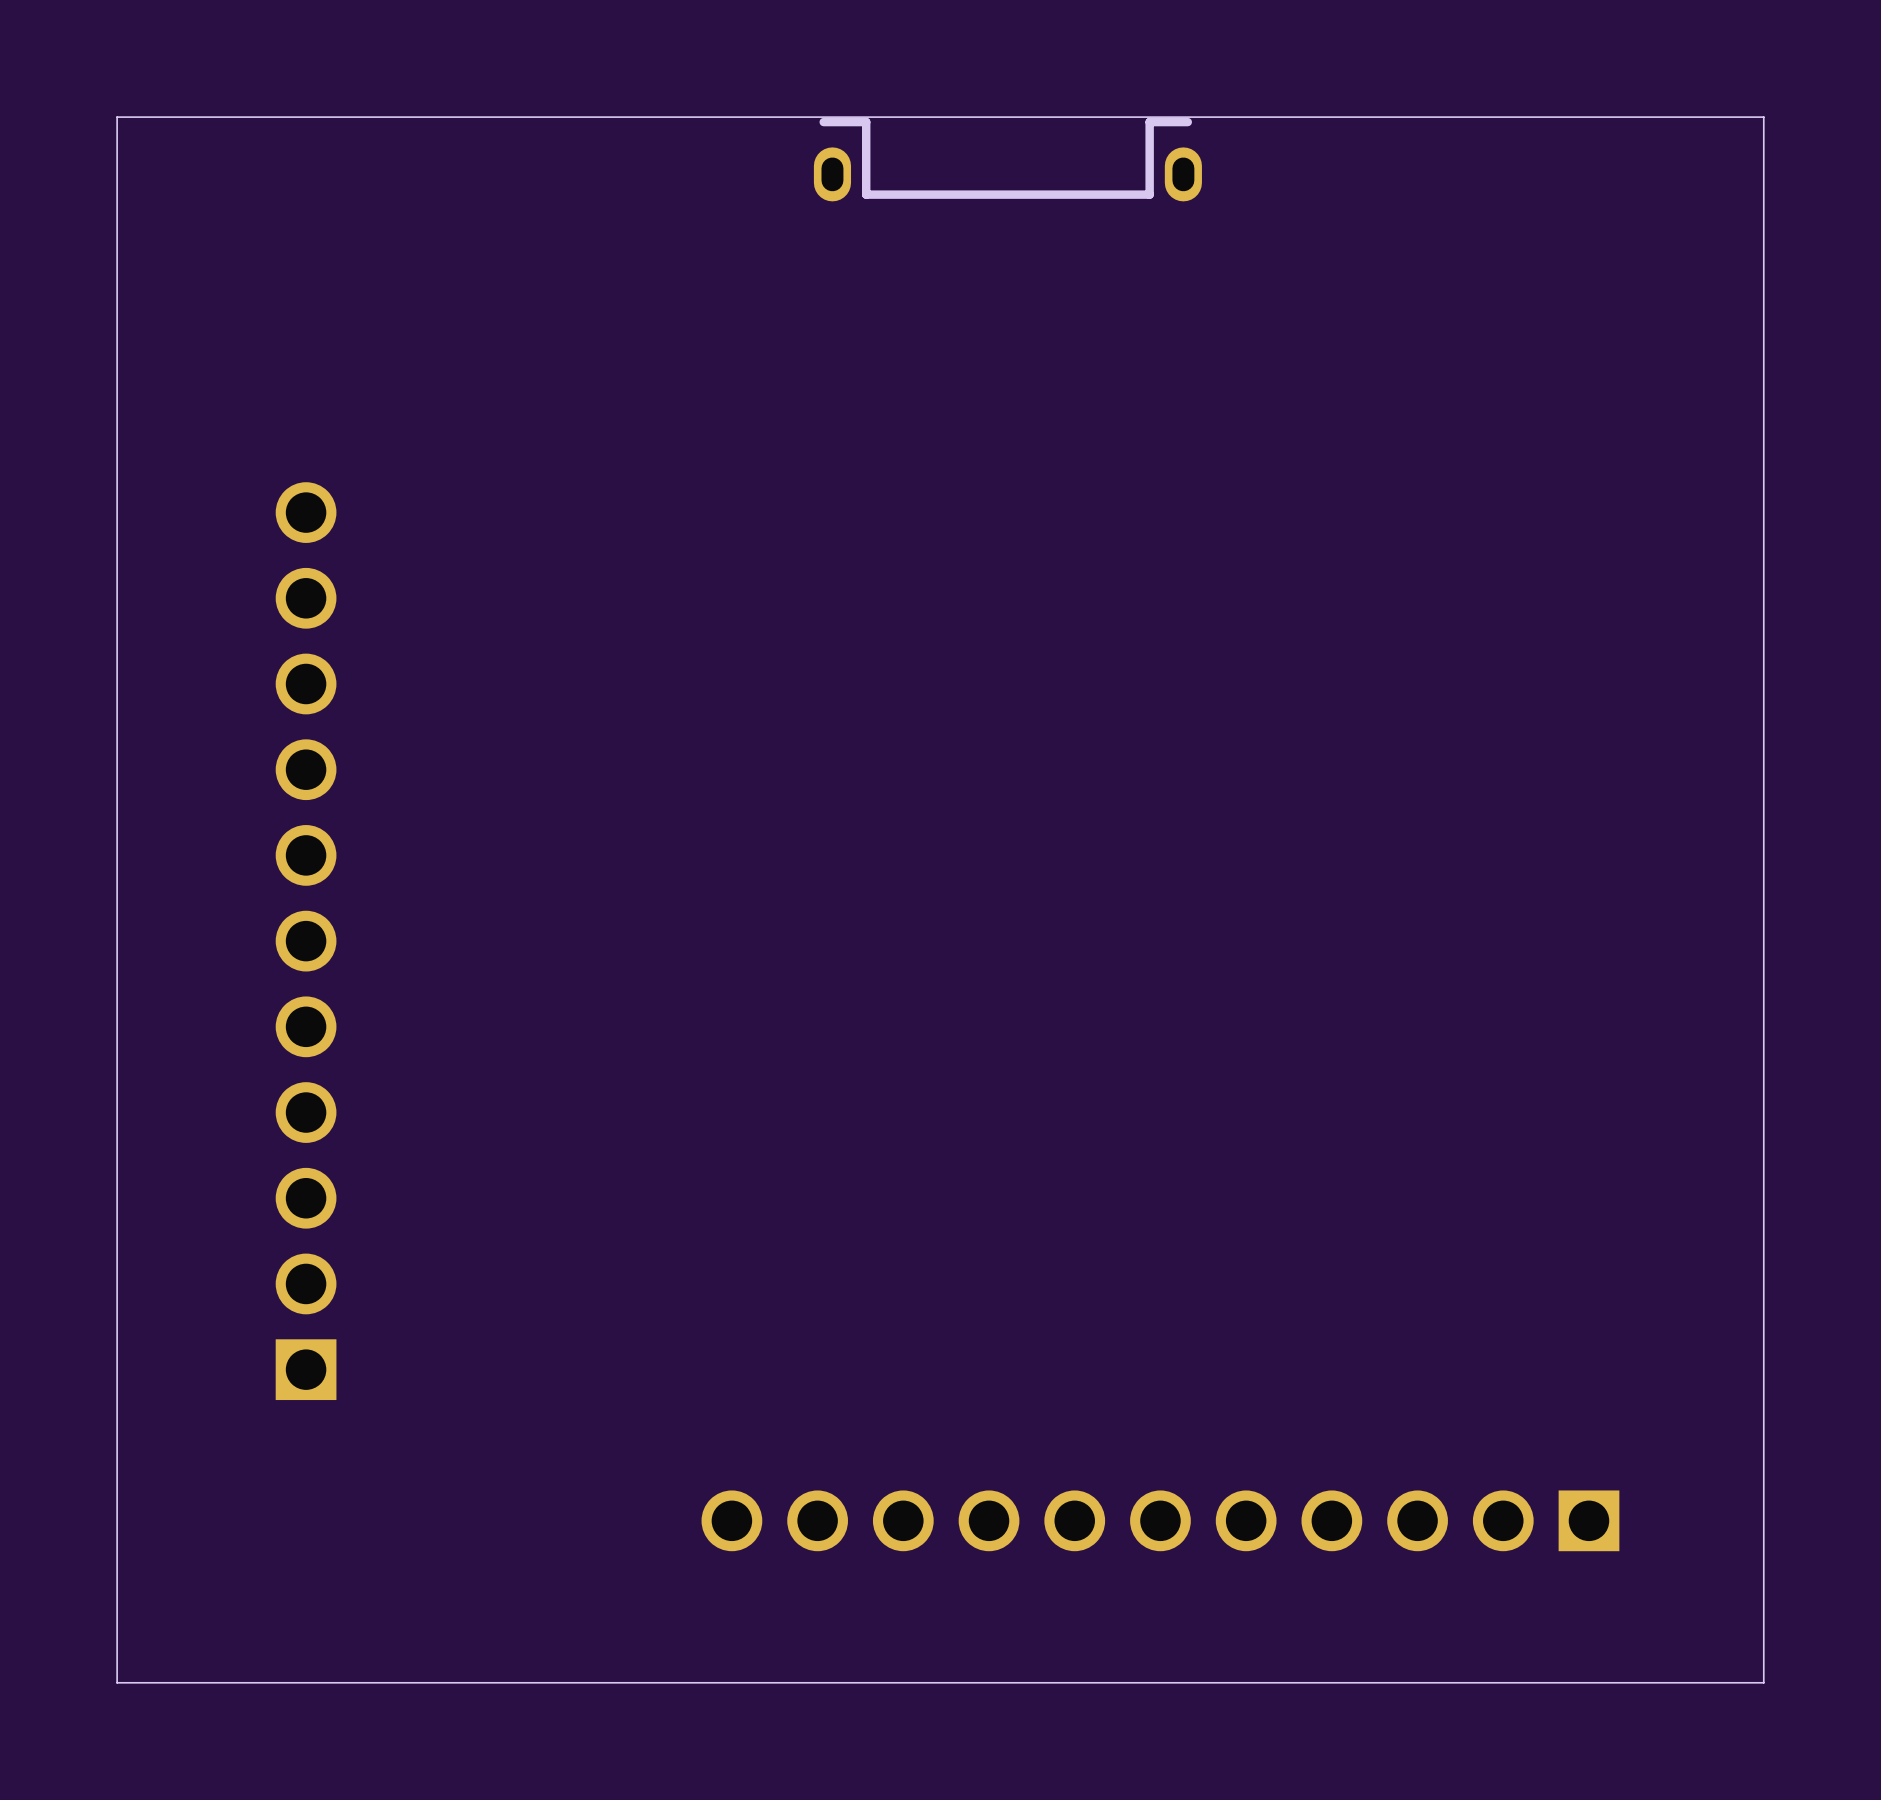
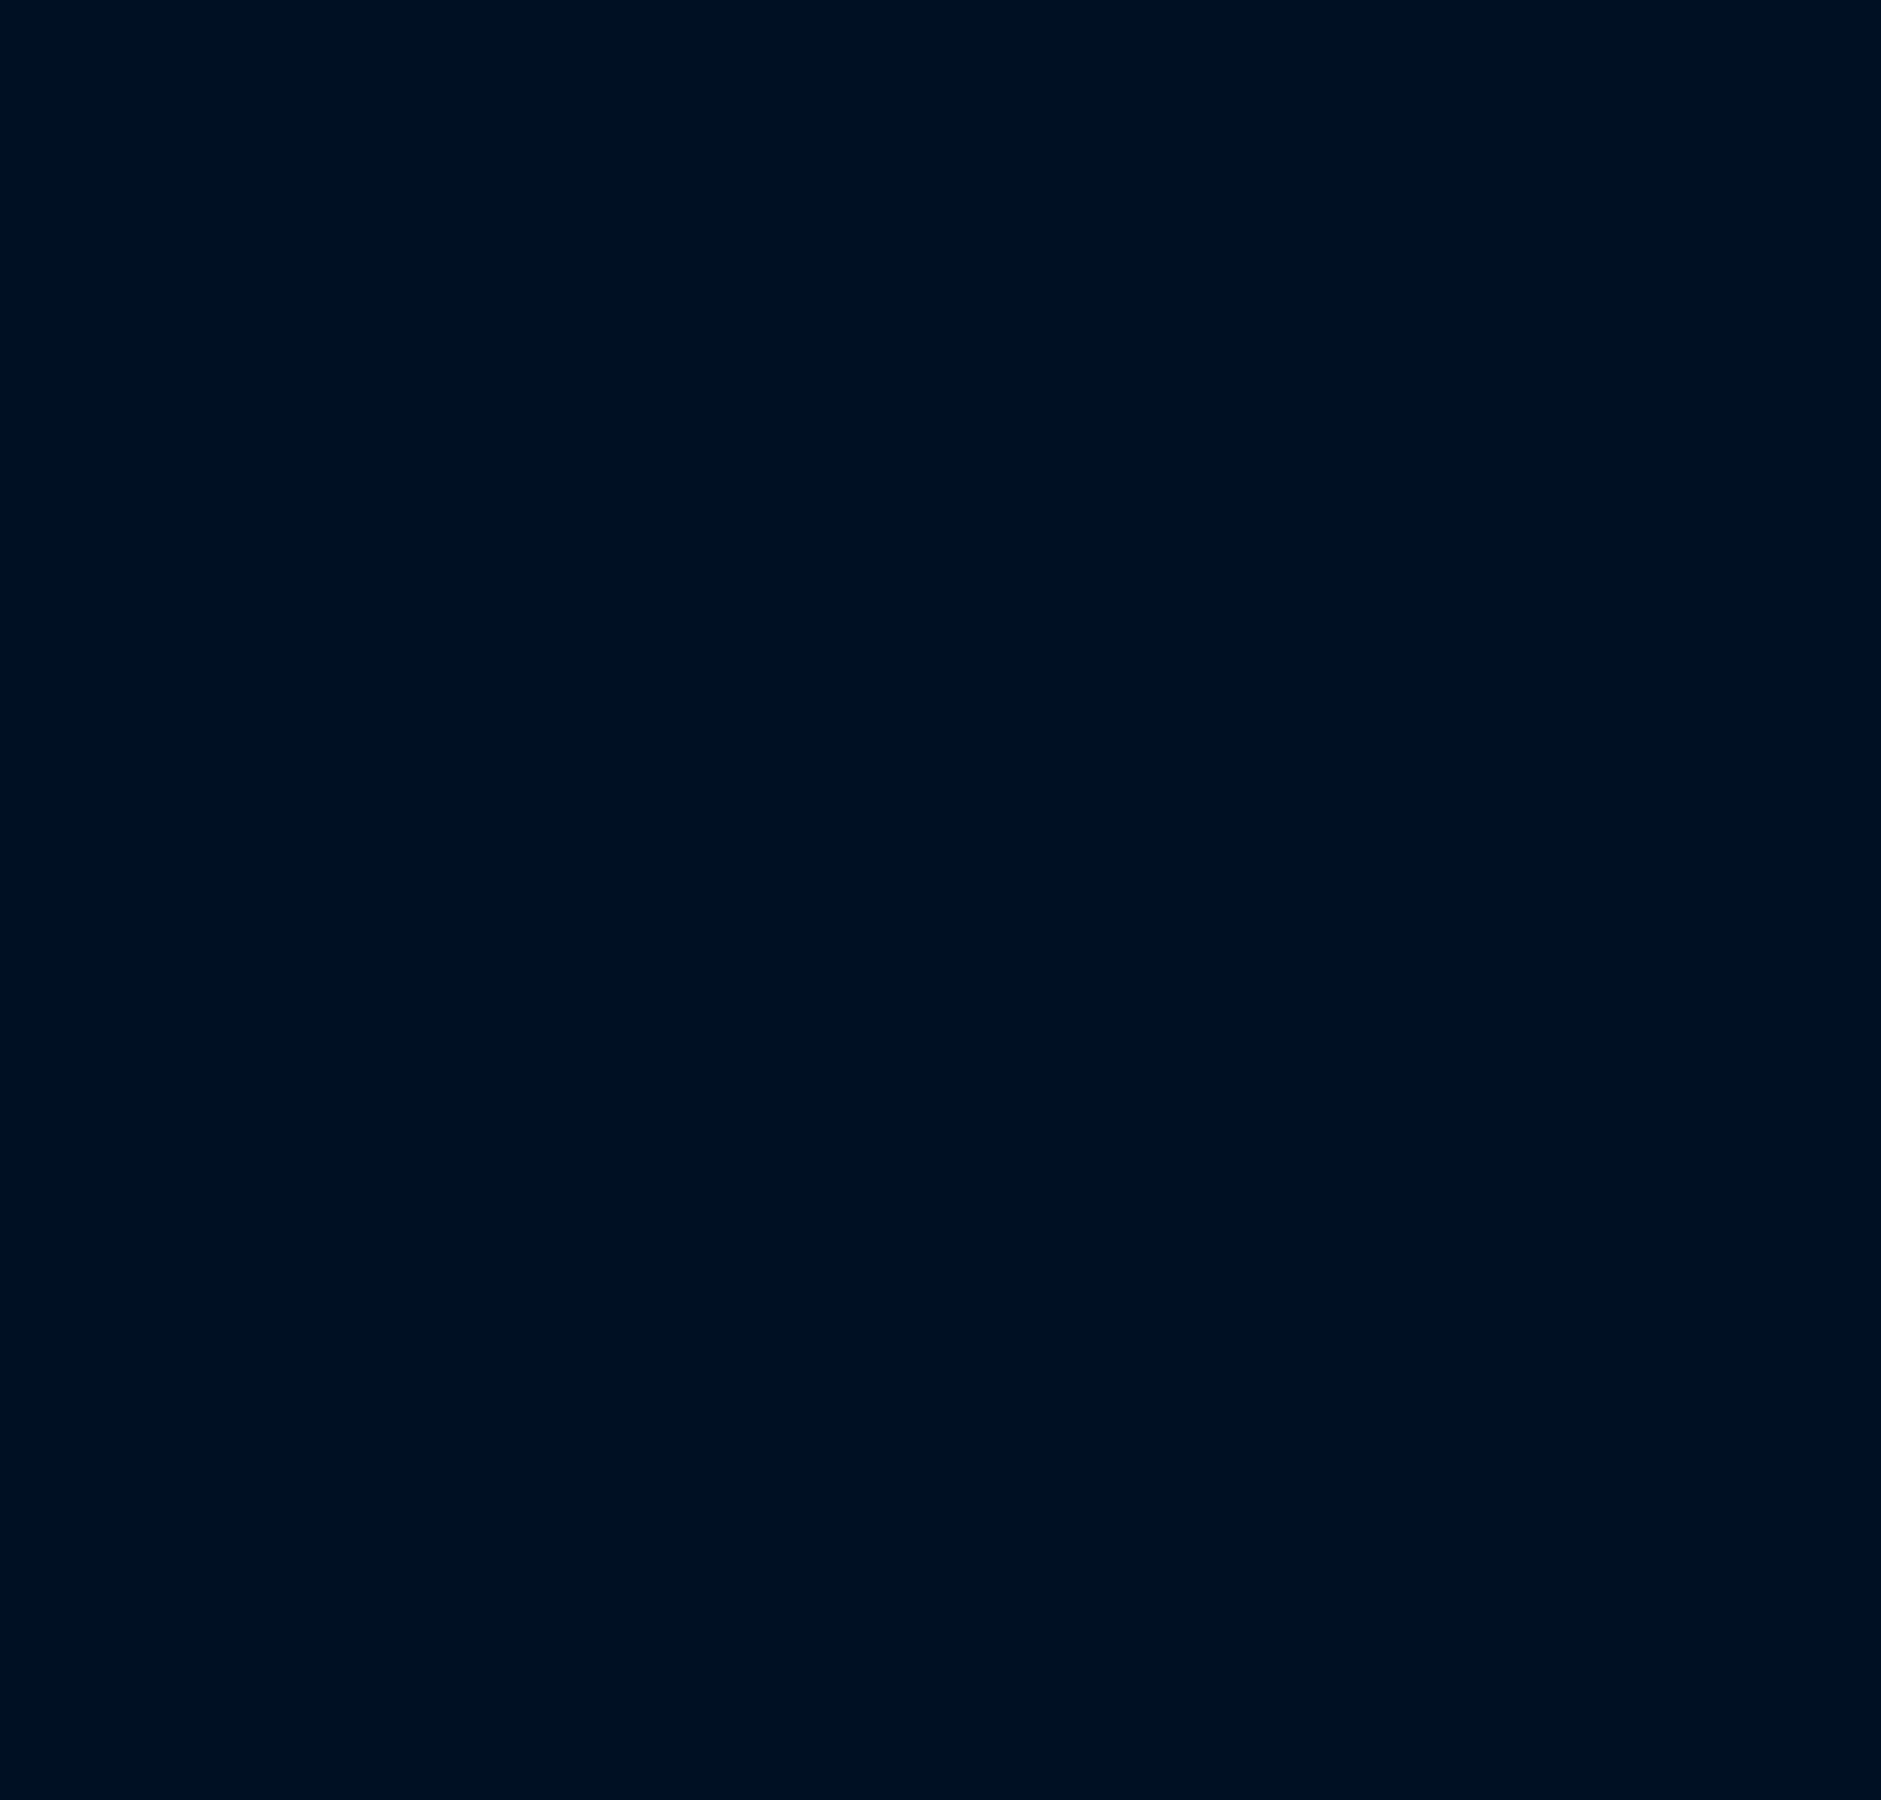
board edge: (1763, 117) (117, 117) (117, 1682) (1763, 1682) (1763, 117) -> none
part: (1007, 159) -> none
part: (306, 941) -> none
part: (1160, 1520) -> none

